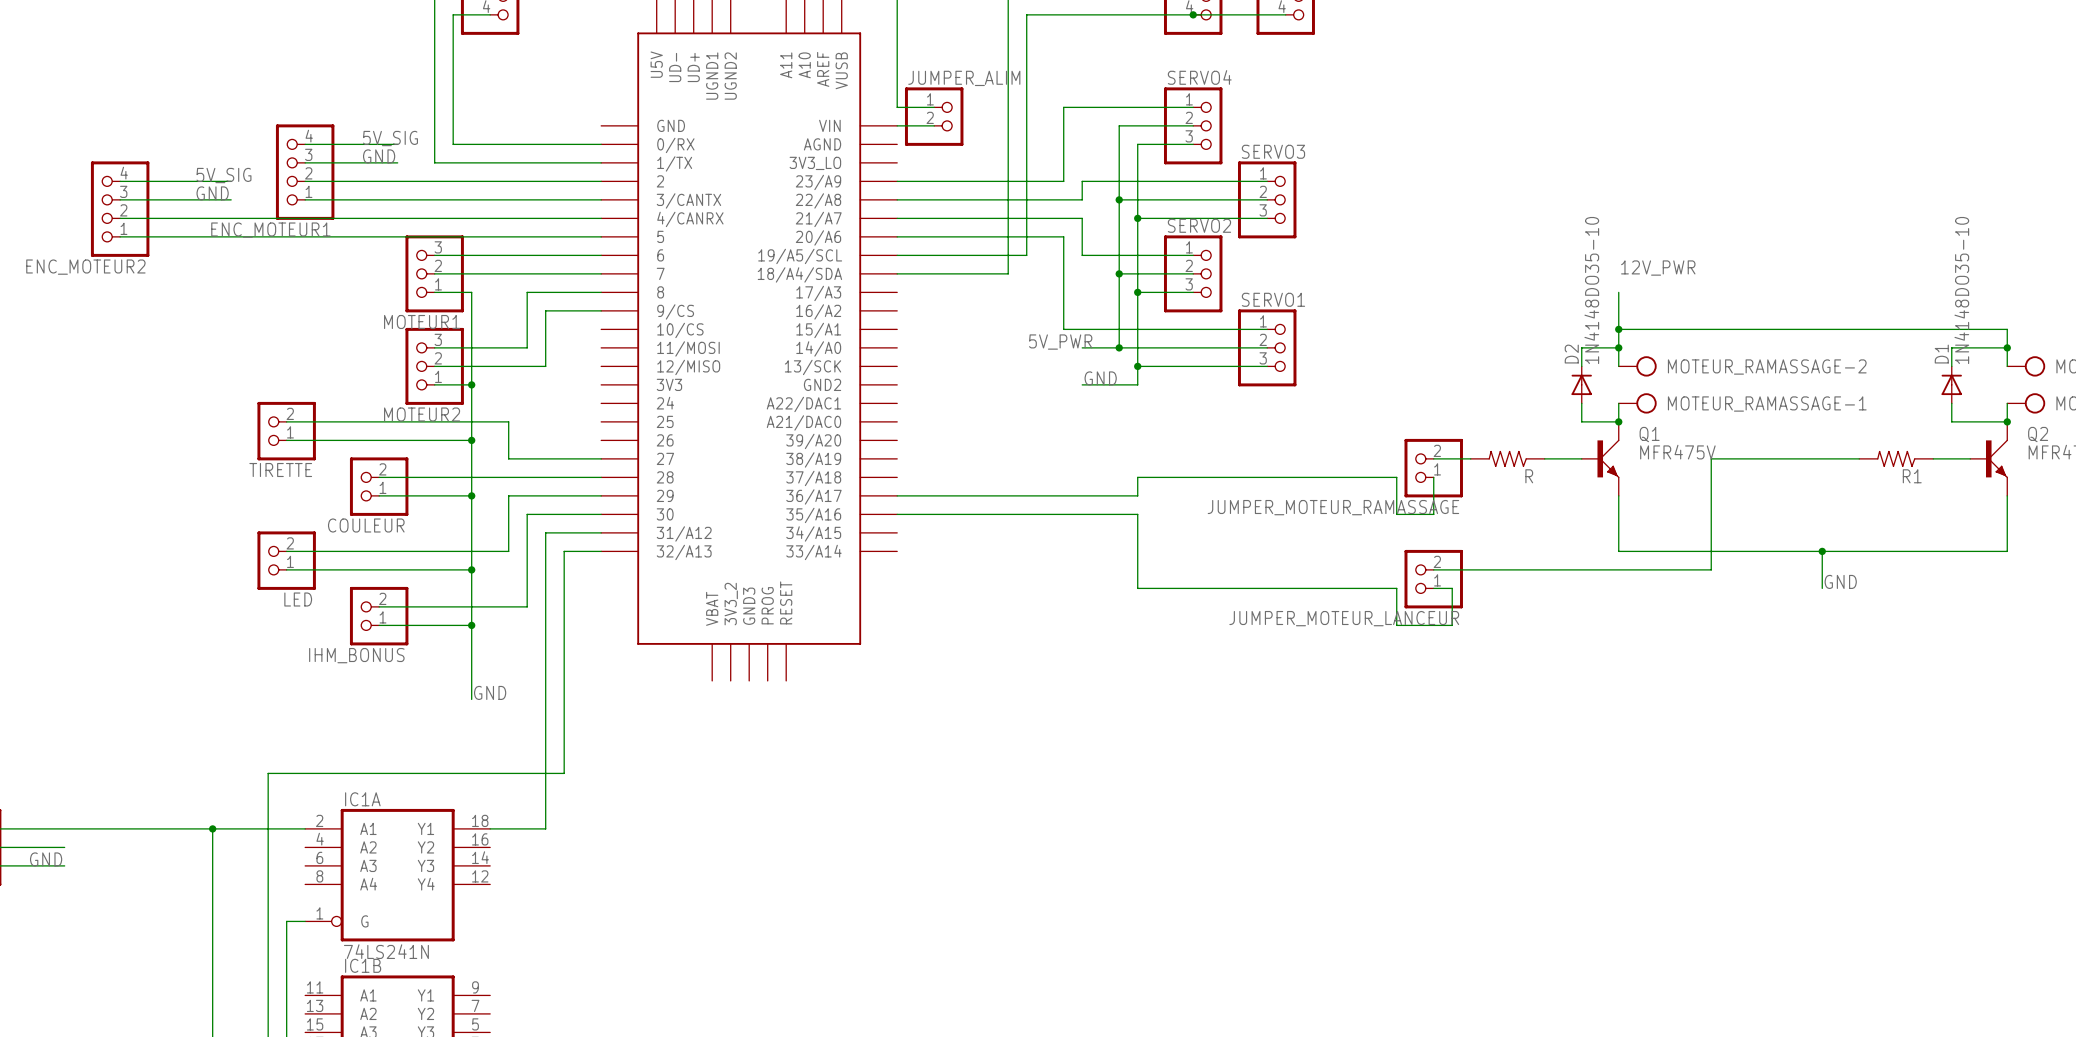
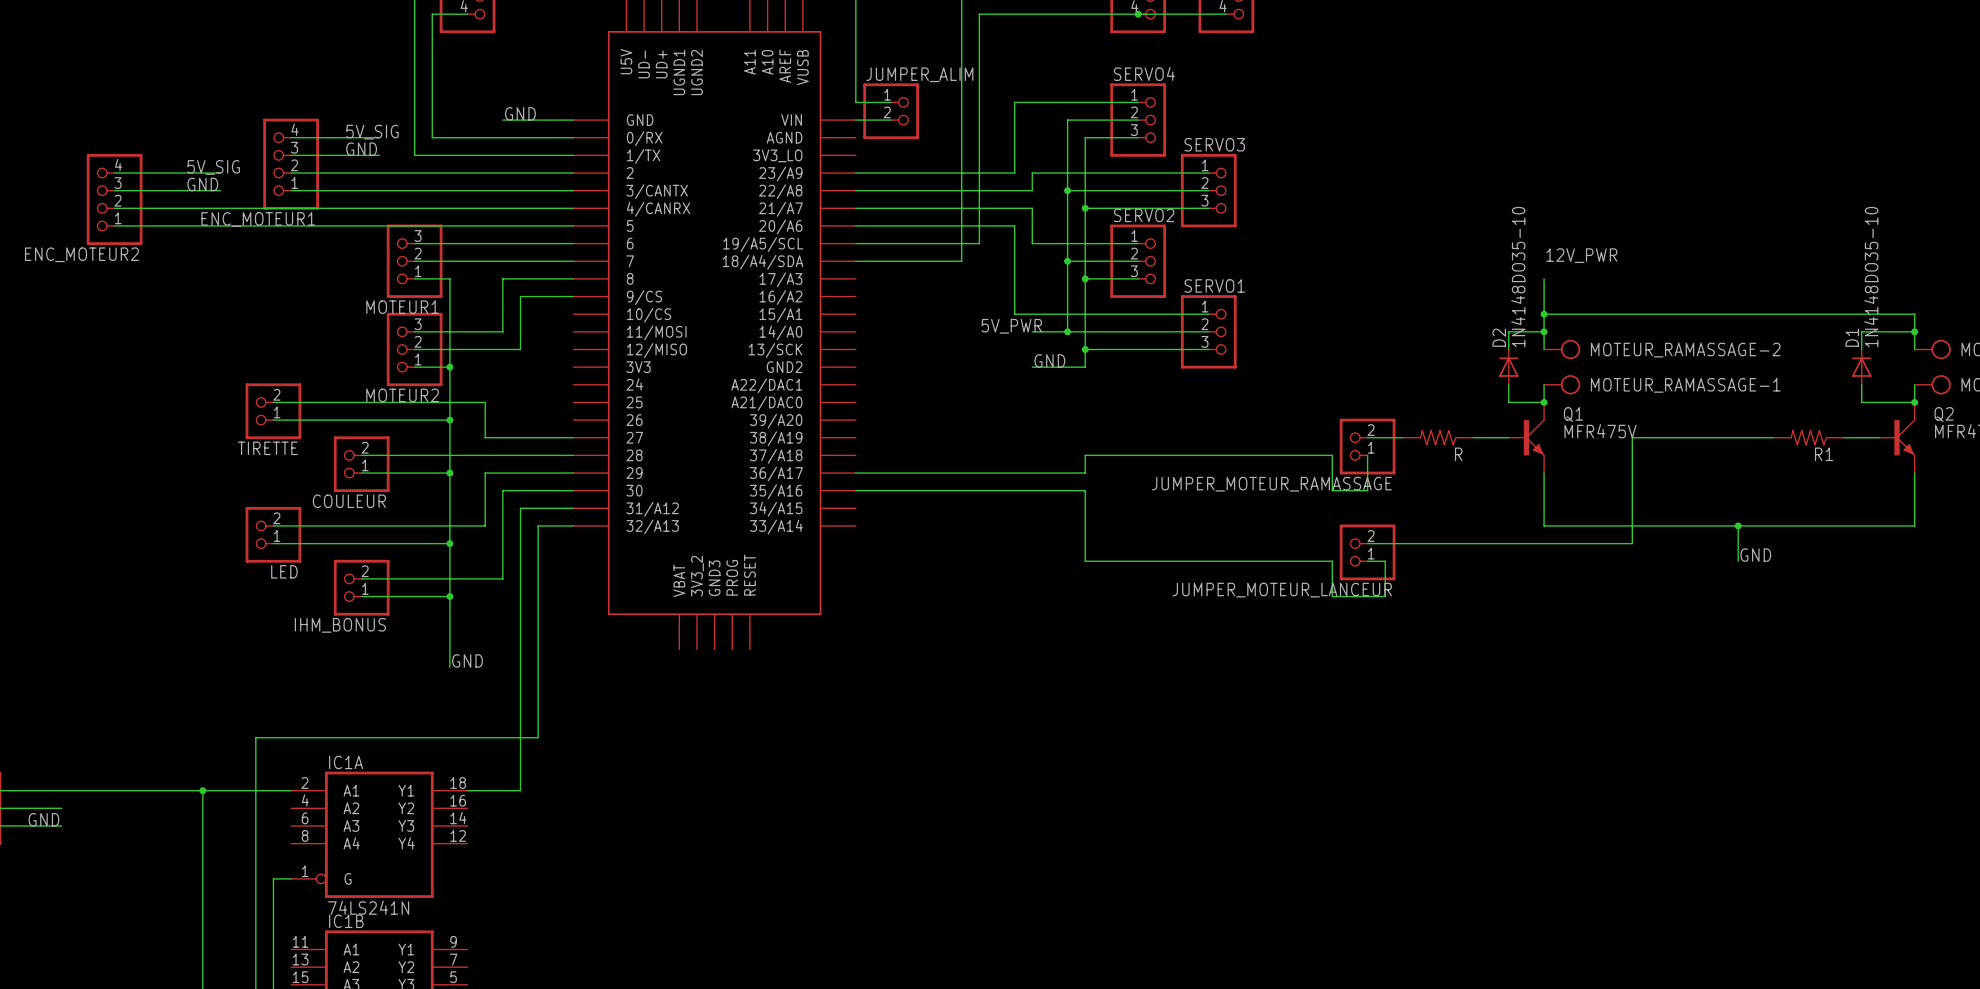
label: none -> GND (520, 113)
wire: none -> (502, 120) (573, 120)

